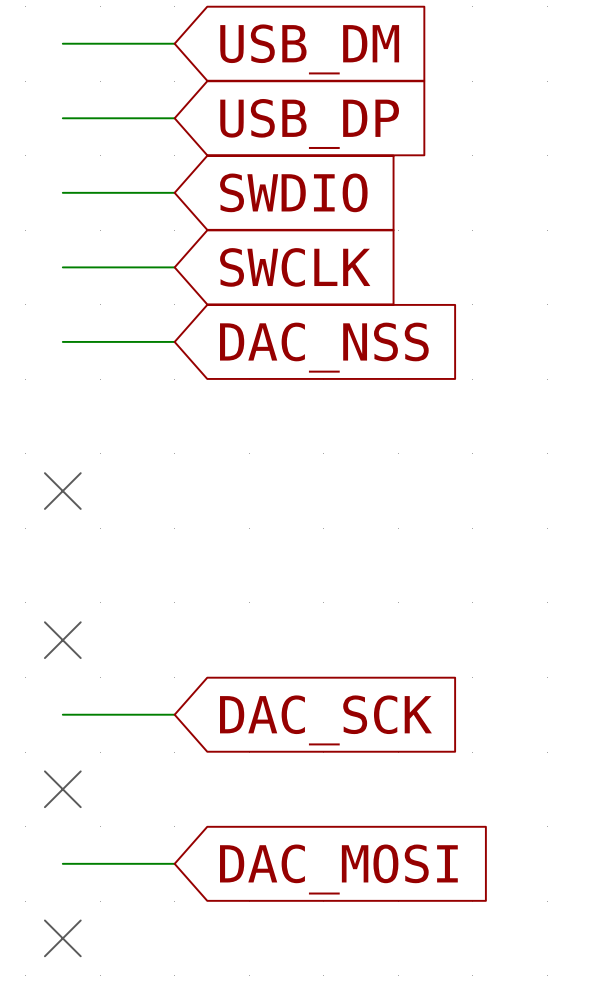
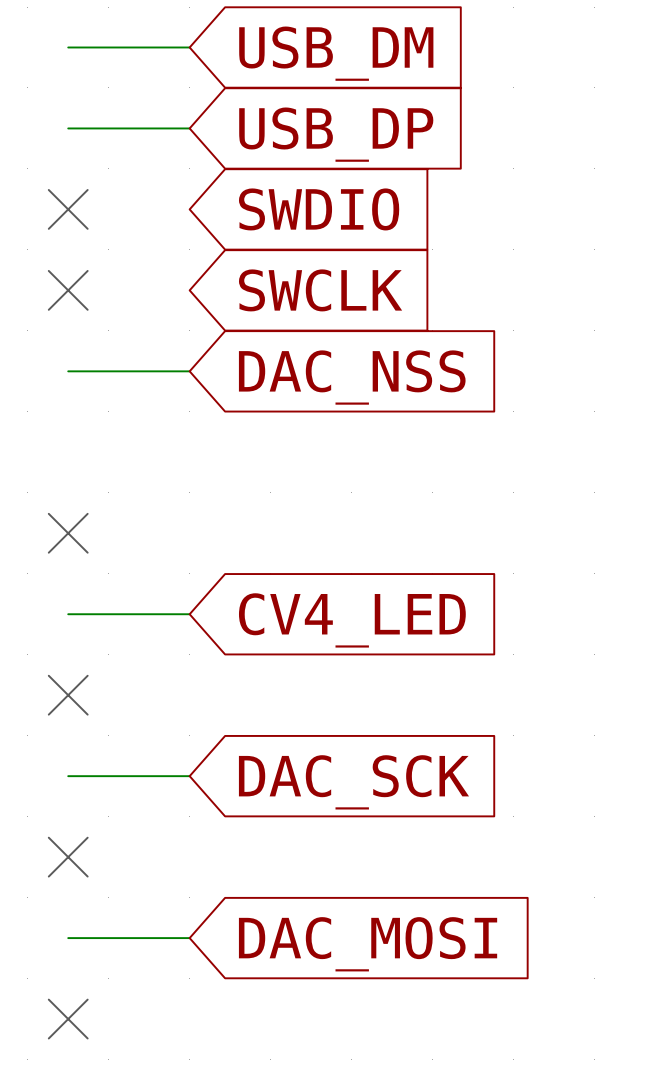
wire: (62, 192) (174, 192) -> none
no-connect mark: none -> (68, 209)
wire: (62, 267) (174, 267) -> (68, 614) (189, 614)
no-connect mark: none -> (68, 290)
global label: none -> CV4_LED (352, 620)

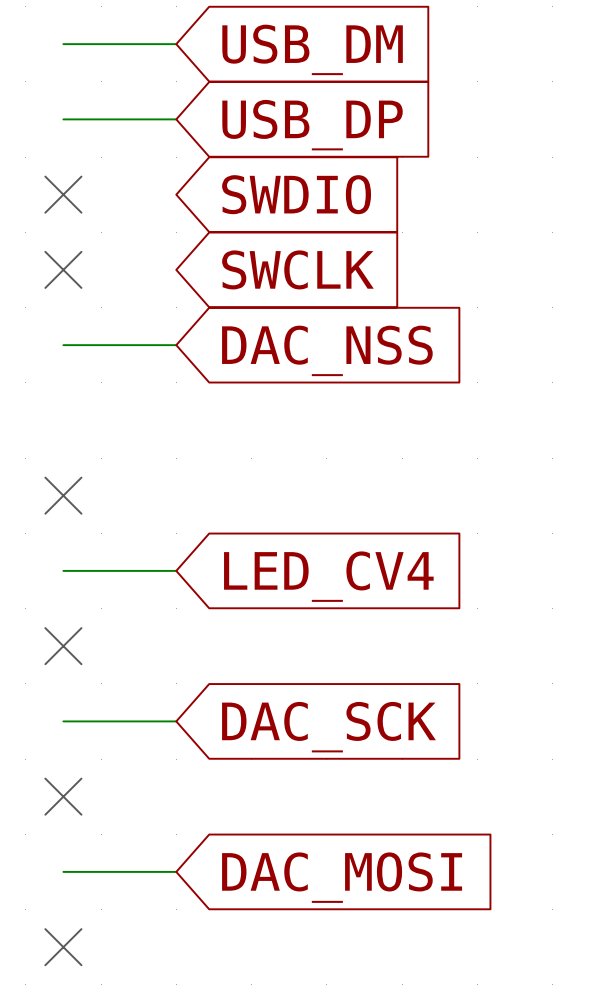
global label: CV4_LED (352, 620) -> LED_CV4 (328, 576)

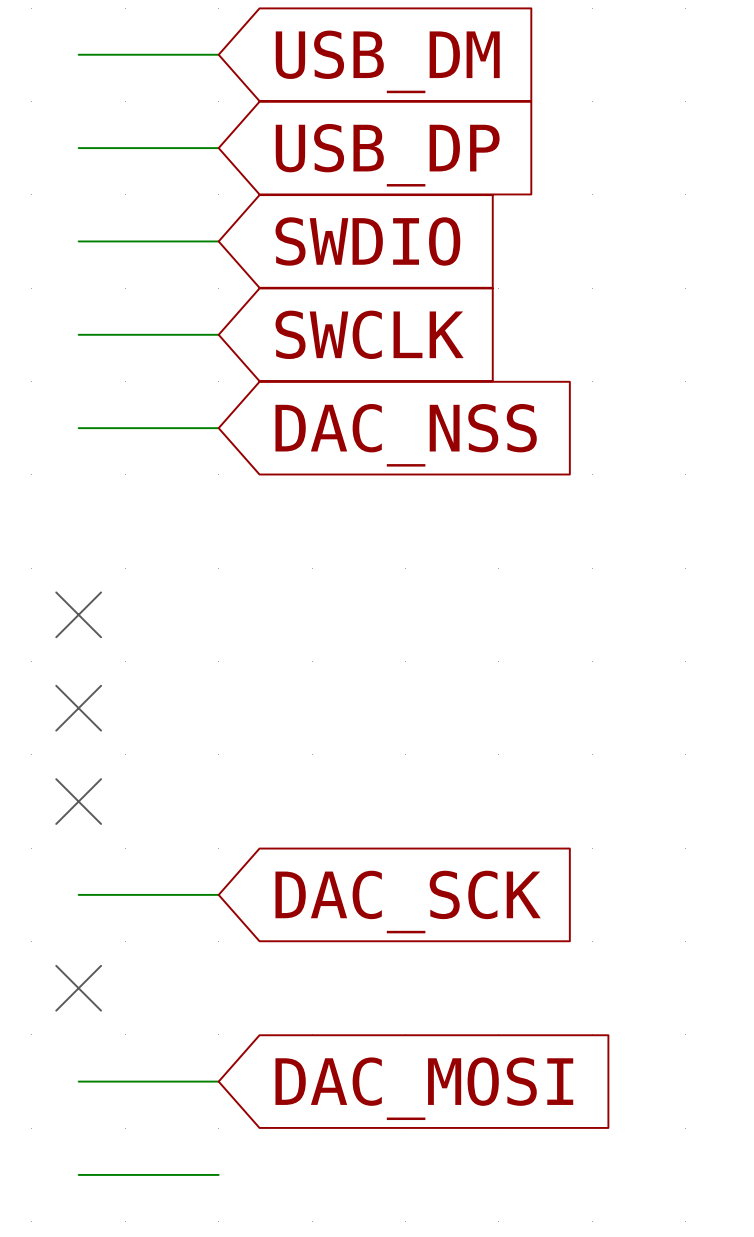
wire: none -> (78, 241) (218, 241)
no-connect mark: (63, 194) -> none
no-connect mark: (63, 269) -> none
wire: (63, 570) (176, 570) -> (78, 334) (218, 334)
no-connect mark: none -> (78, 708)
global label: LED_CV4 (328, 576) -> none
wire: none -> (78, 1174) (218, 1174)
no-connect mark: (63, 947) -> none

